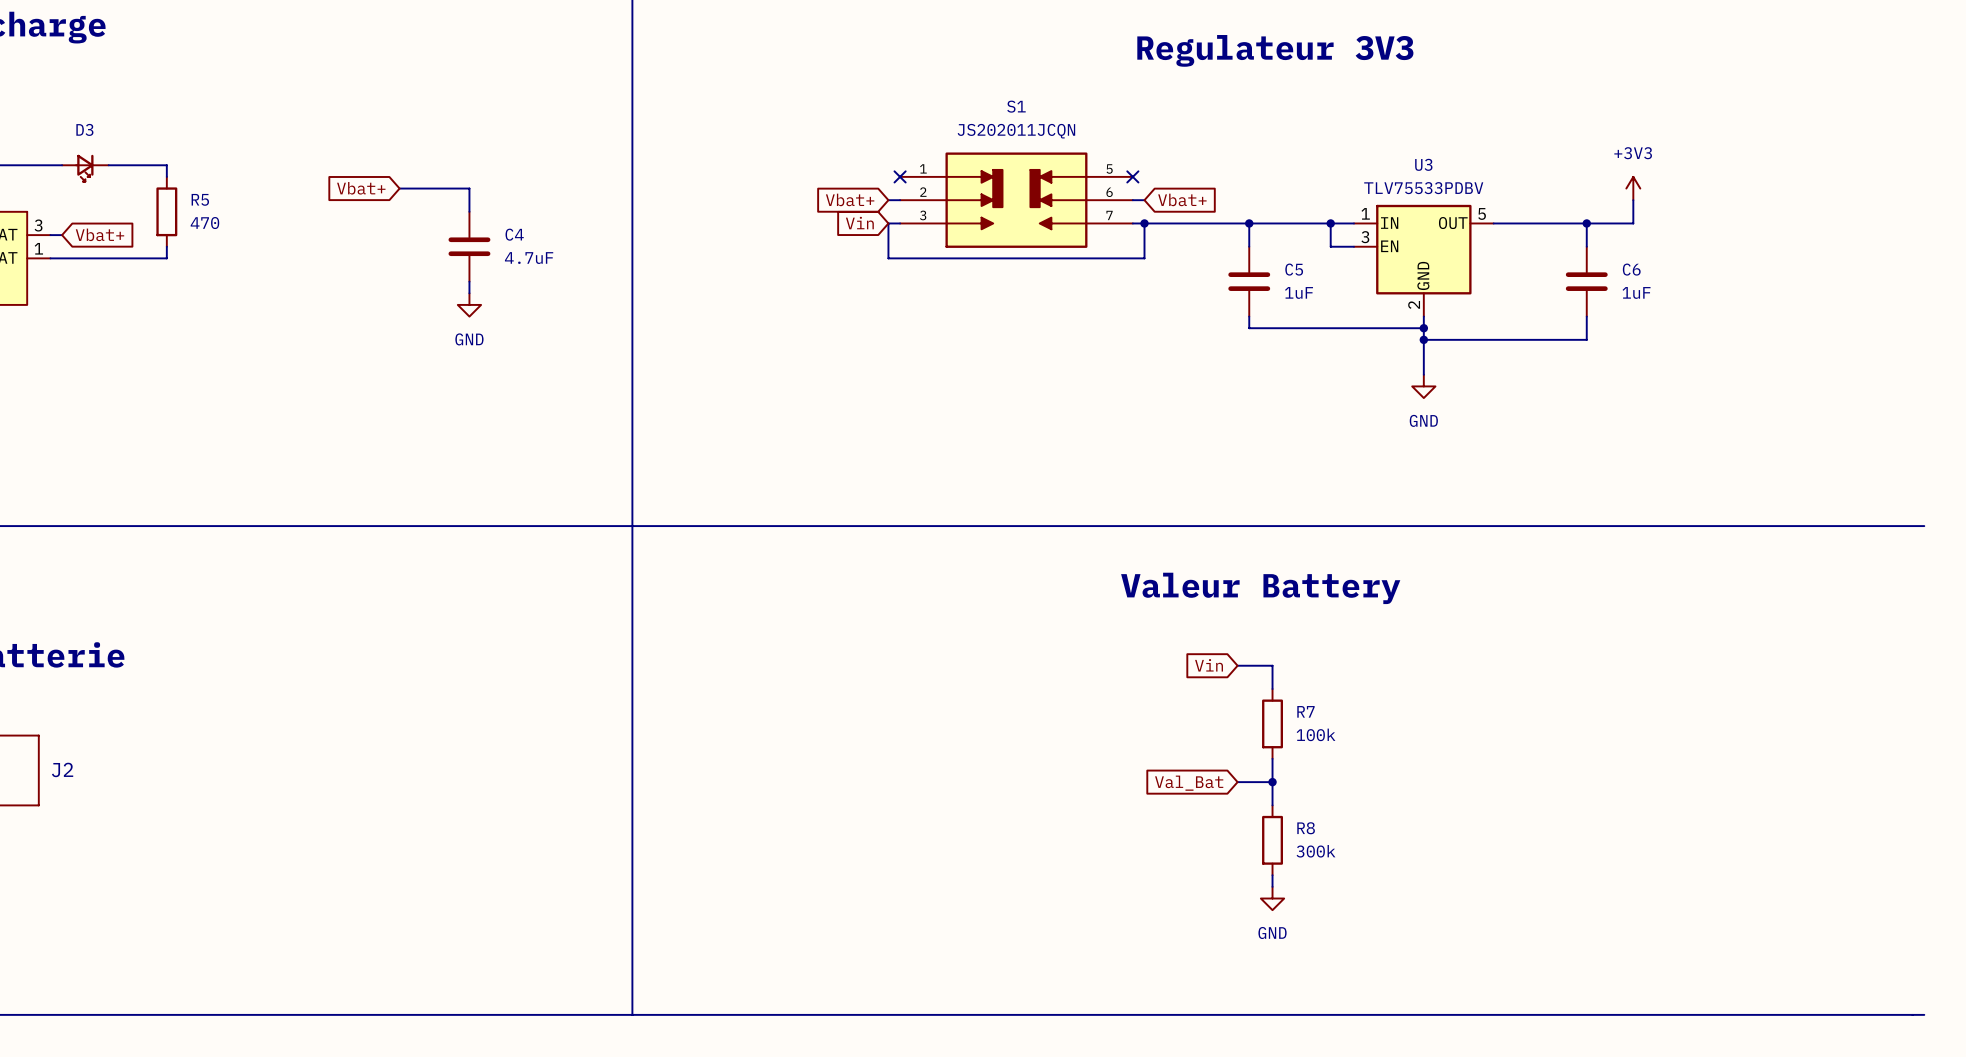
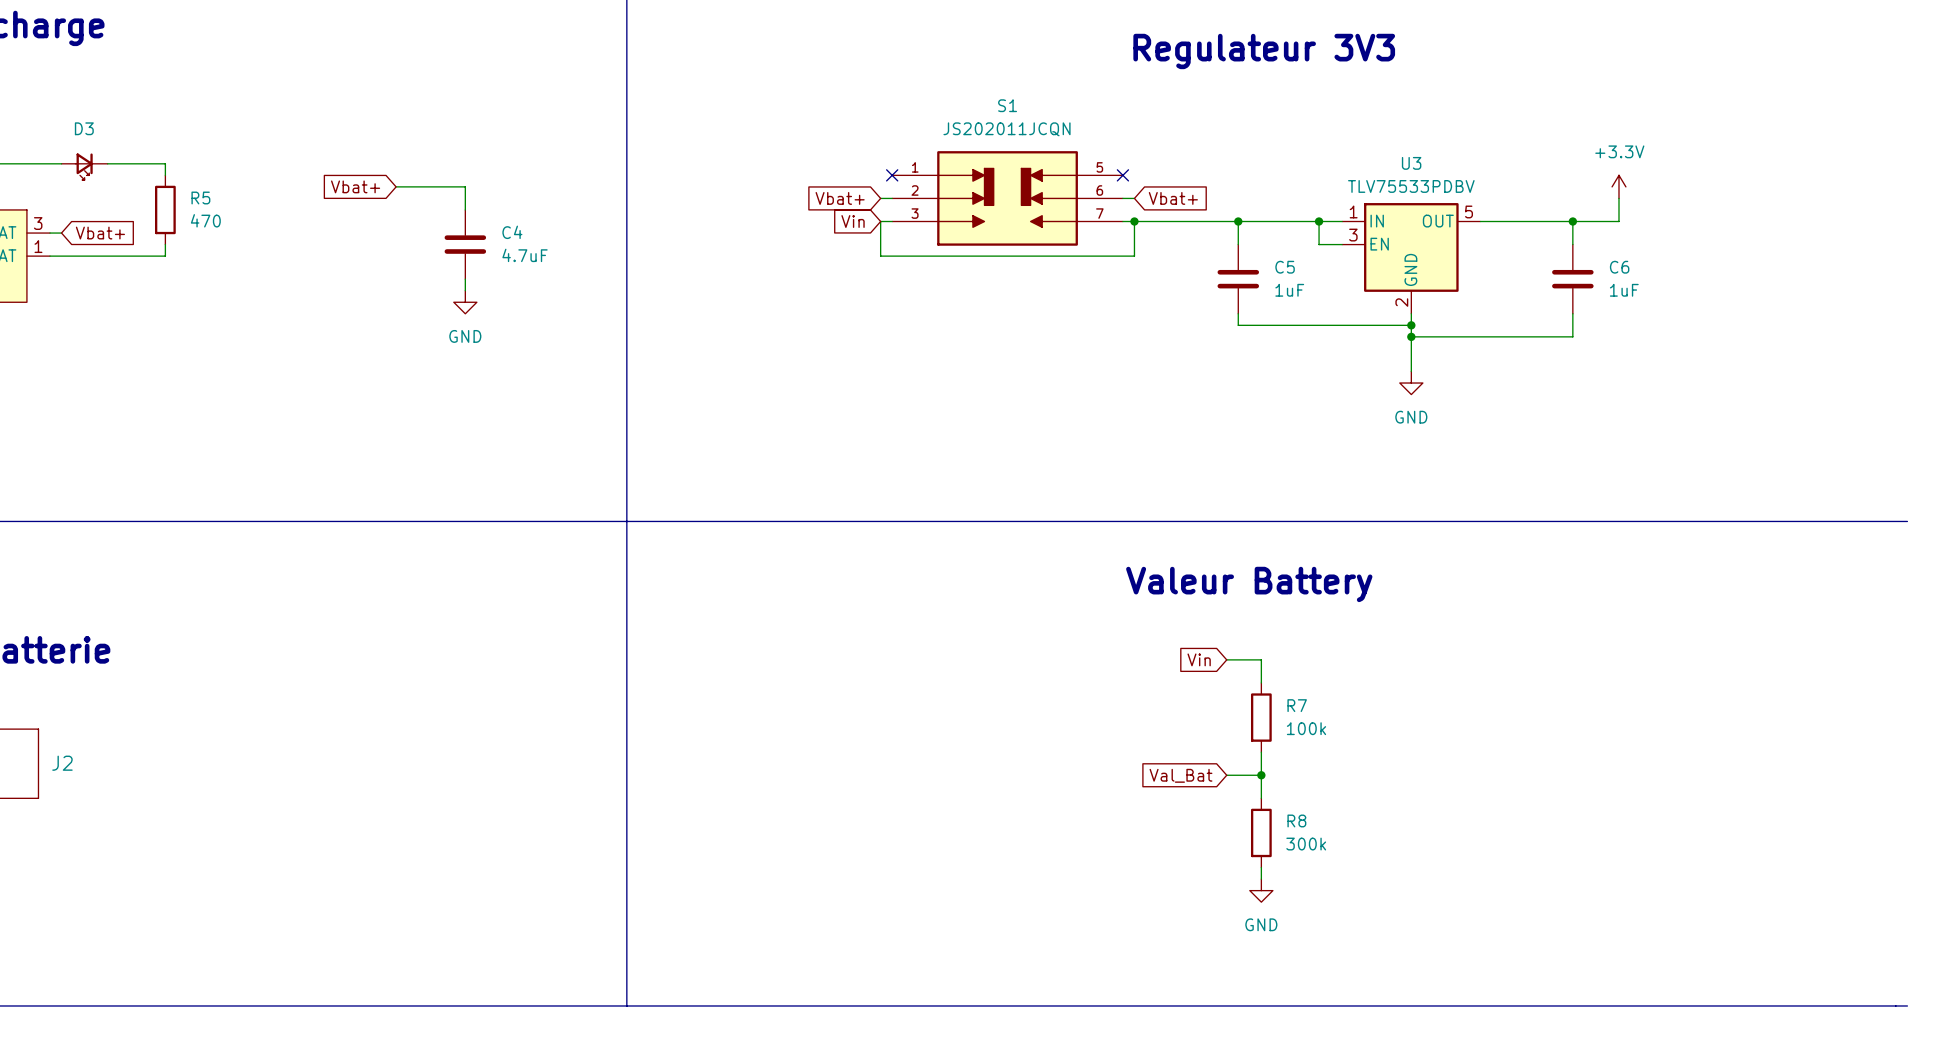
power symbol: +3V3 (1633, 188) -> +3.3V (1618, 186)

